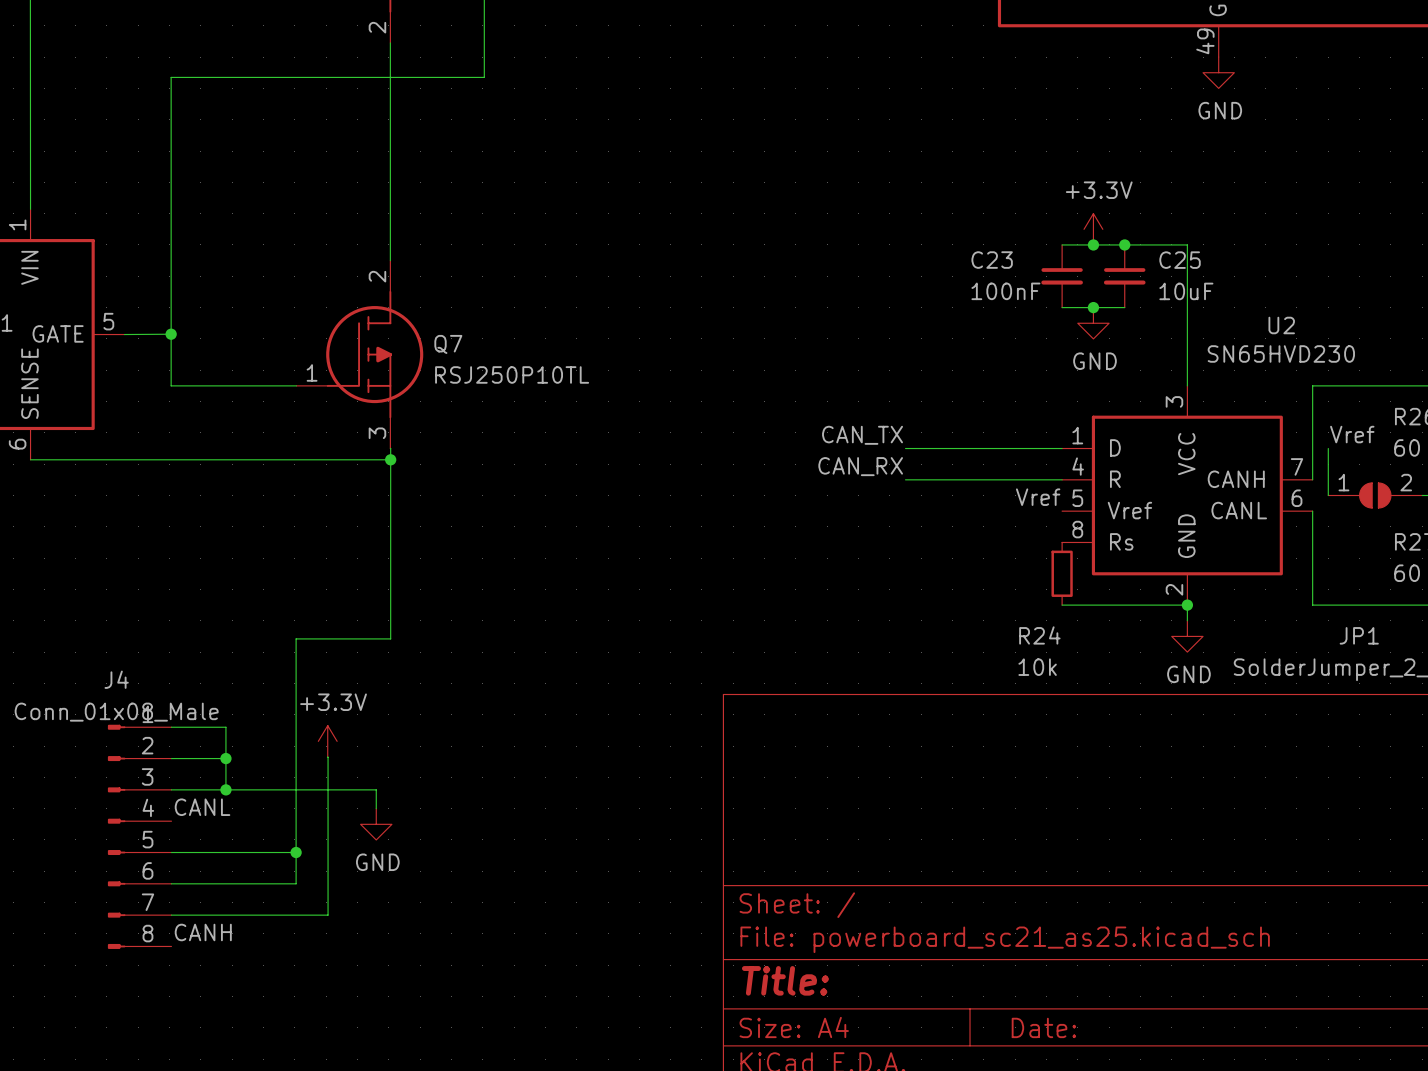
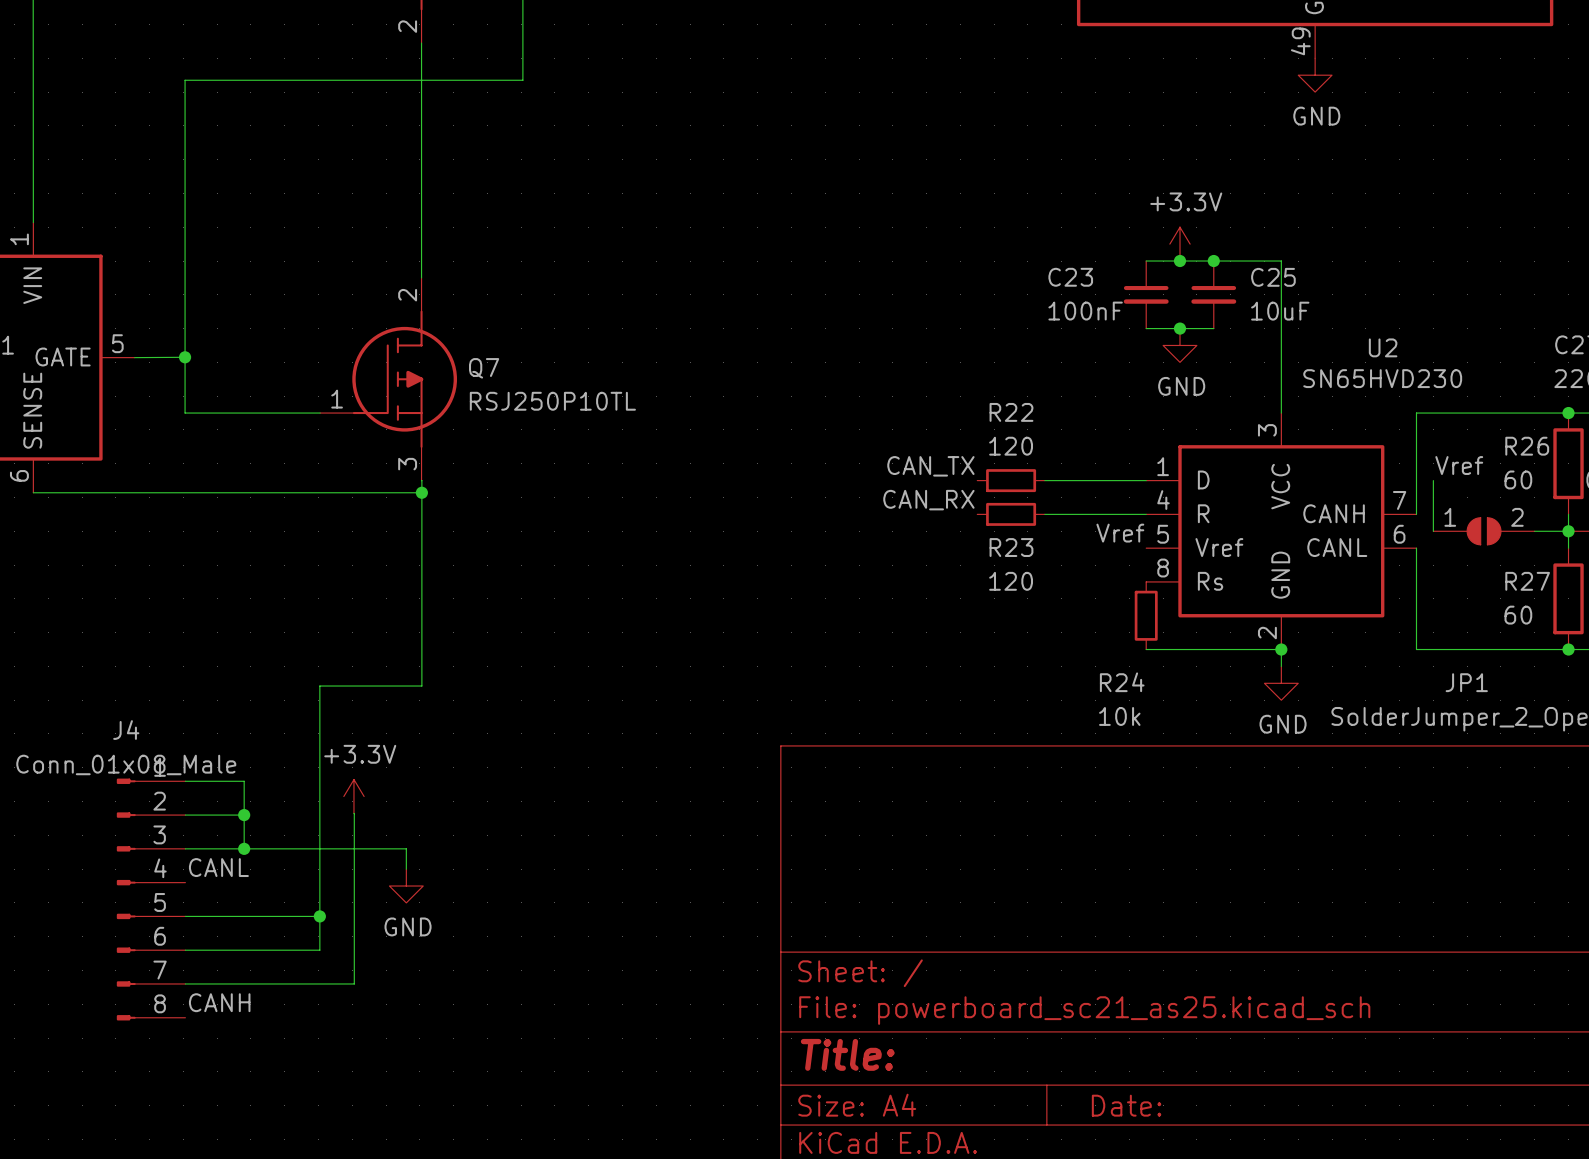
wire: (905, 448) (968, 448) -> none
R22: none -> 120 (1011, 480)
wire: (905, 479) (968, 479) -> none
R23: none -> 120 (1011, 514)

